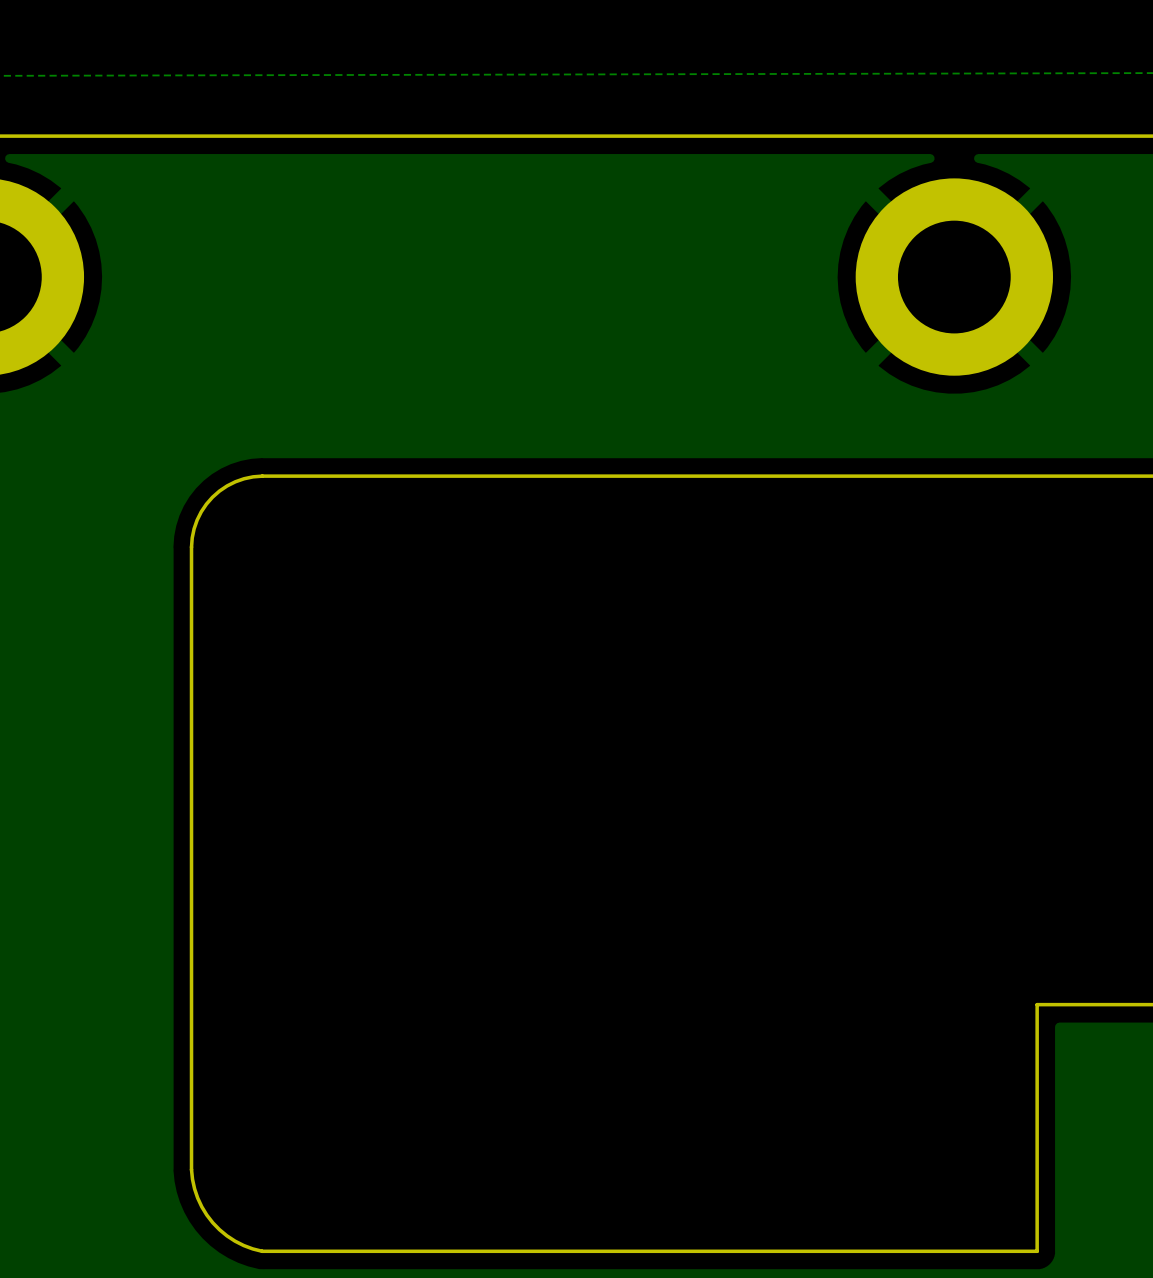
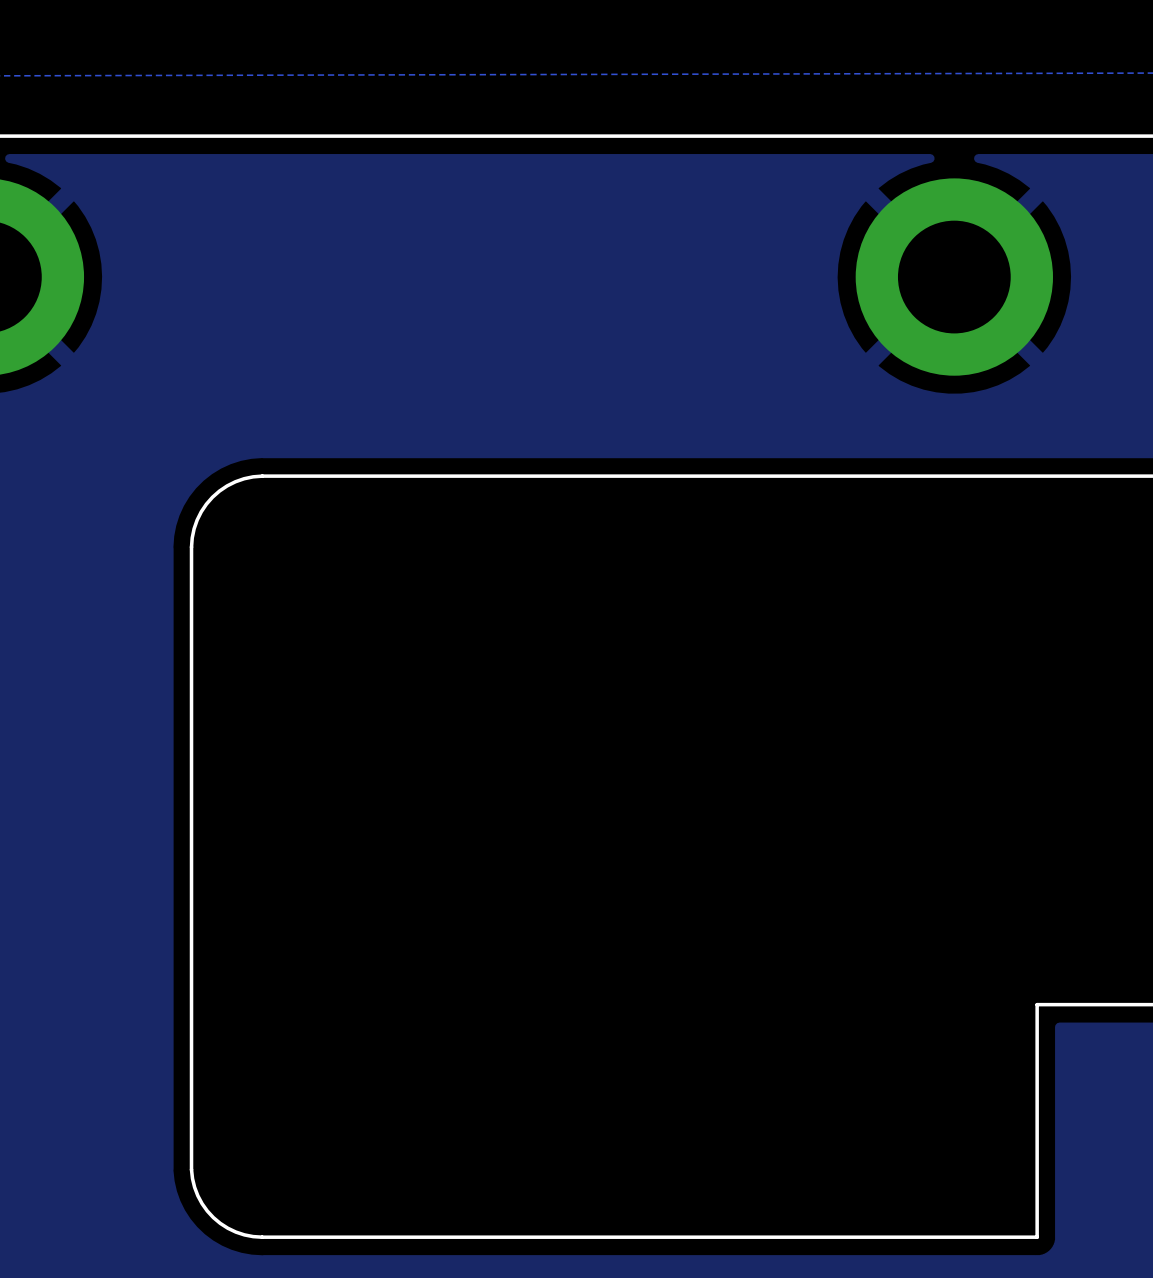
board edge: (191, 1169) (197, 1198) (212, 1222) (235, 1241) (262, 1251) (1037, 1251) (1037, 1237) -> (191, 1169) (197, 1195) (213, 1217) (235, 1232) (253, 1236) (1037, 1237)

